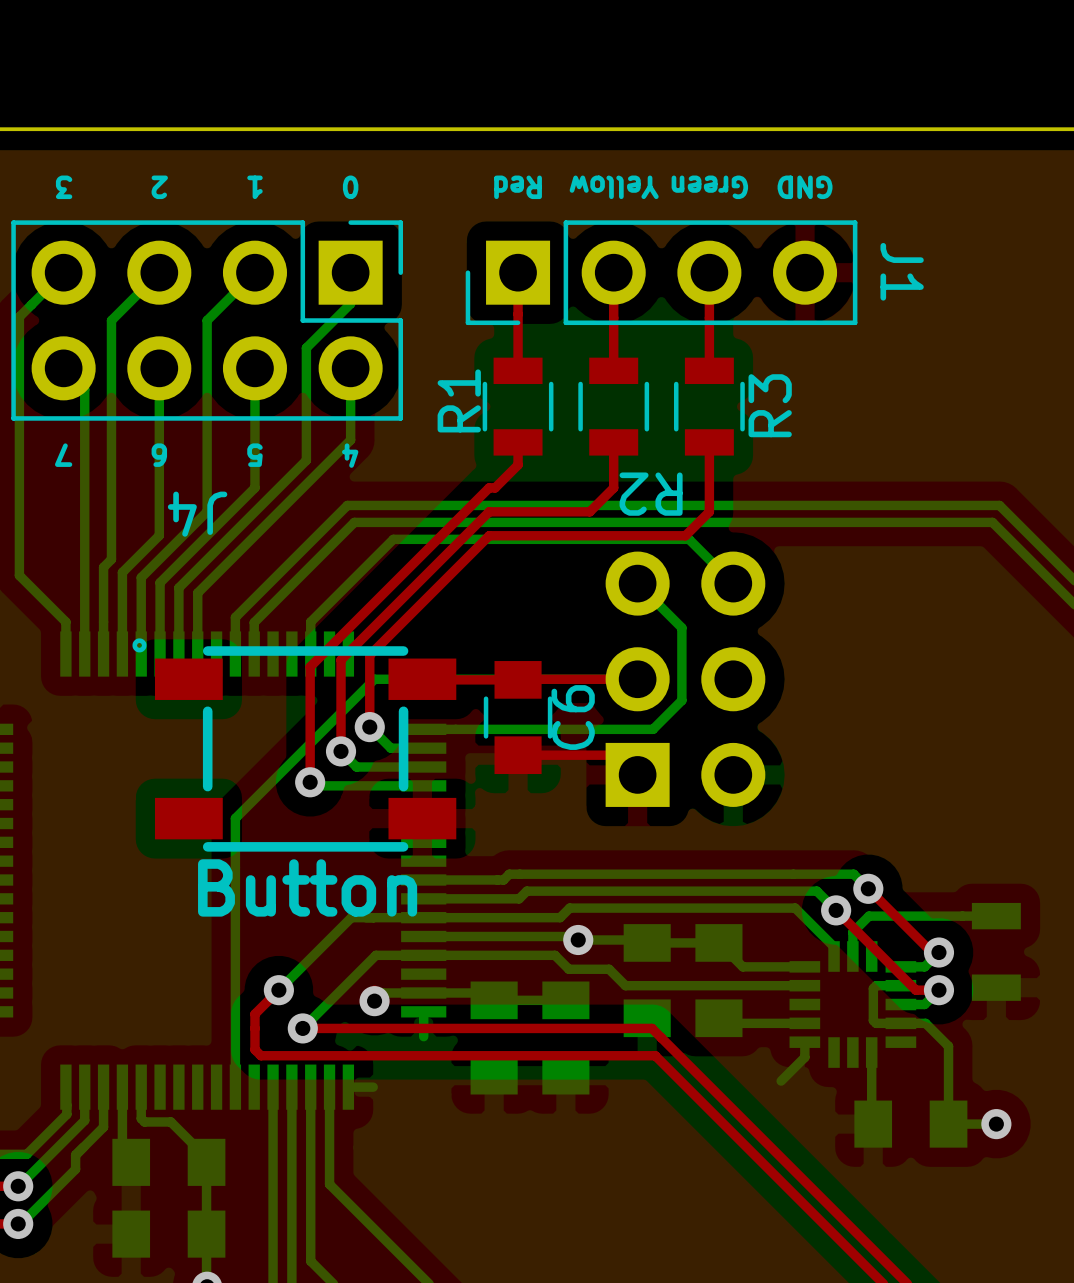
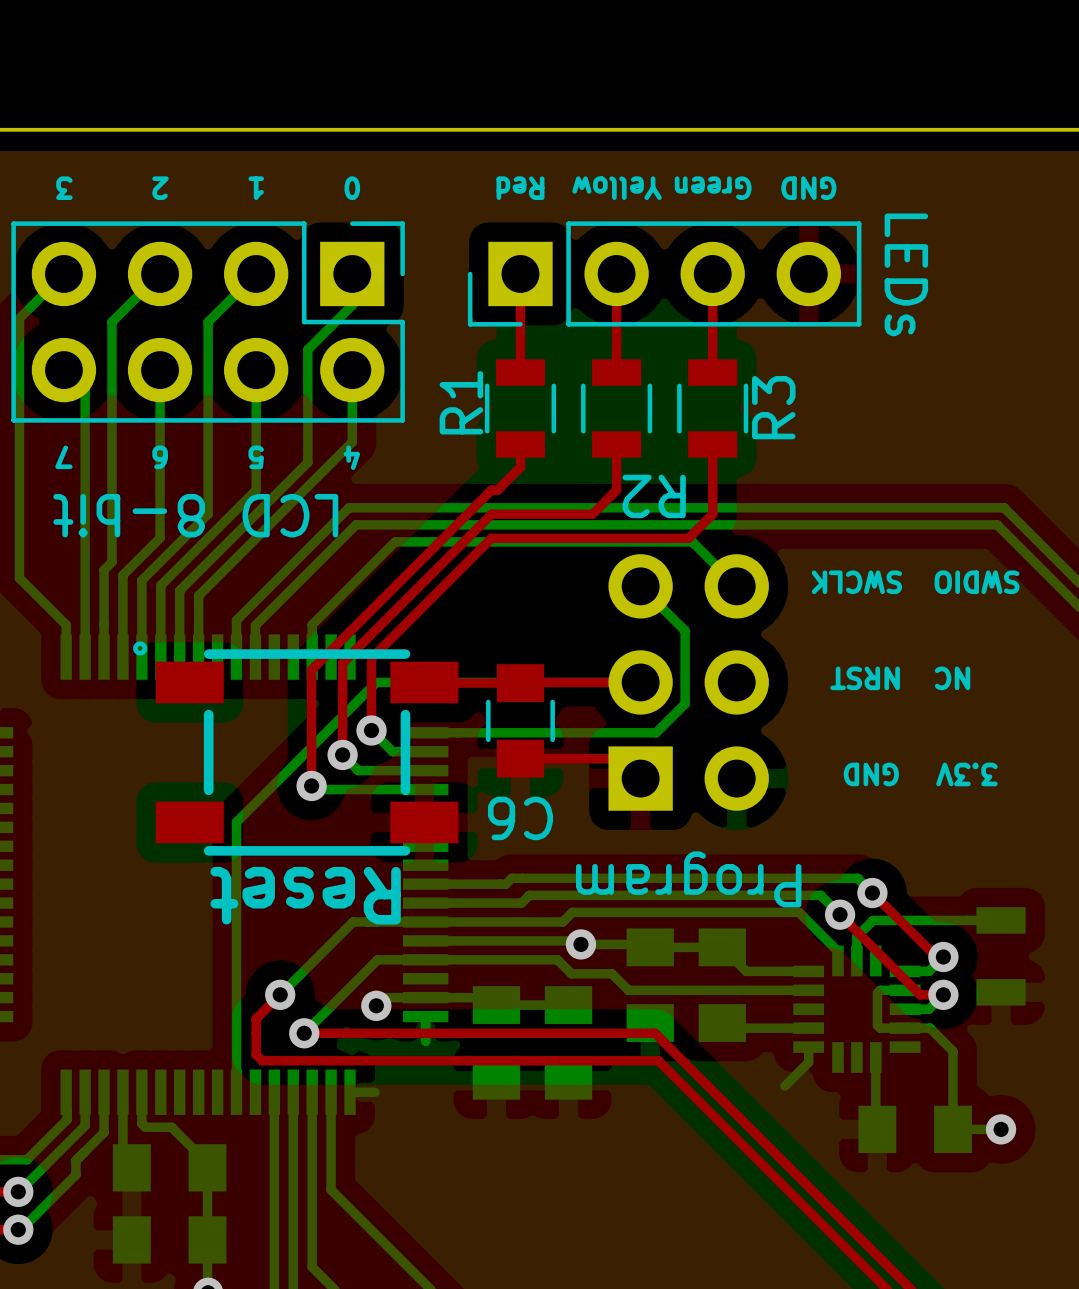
J1 name: J1 (902, 271) -> LEDs (906, 274)
J4 name: J4 (197, 514) -> LCD 8-bit (195, 515)
text: none -> SWCLK (856, 582)
text: none -> SWDIO (977, 582)
text: none -> NRST (865, 678)
text: none -> NC (952, 678)
C6 name rotation: 0° (573, 717) -> 90° counterclockwise (520, 818)
C6 name position: C6 (573, 717) -> C6 (520, 818)
text: none -> GND (871, 774)
text: none -> 3.3V (966, 774)
Program name: none -> Program (688, 879)
part value: Button (307, 887) -> Reset (305, 895)

